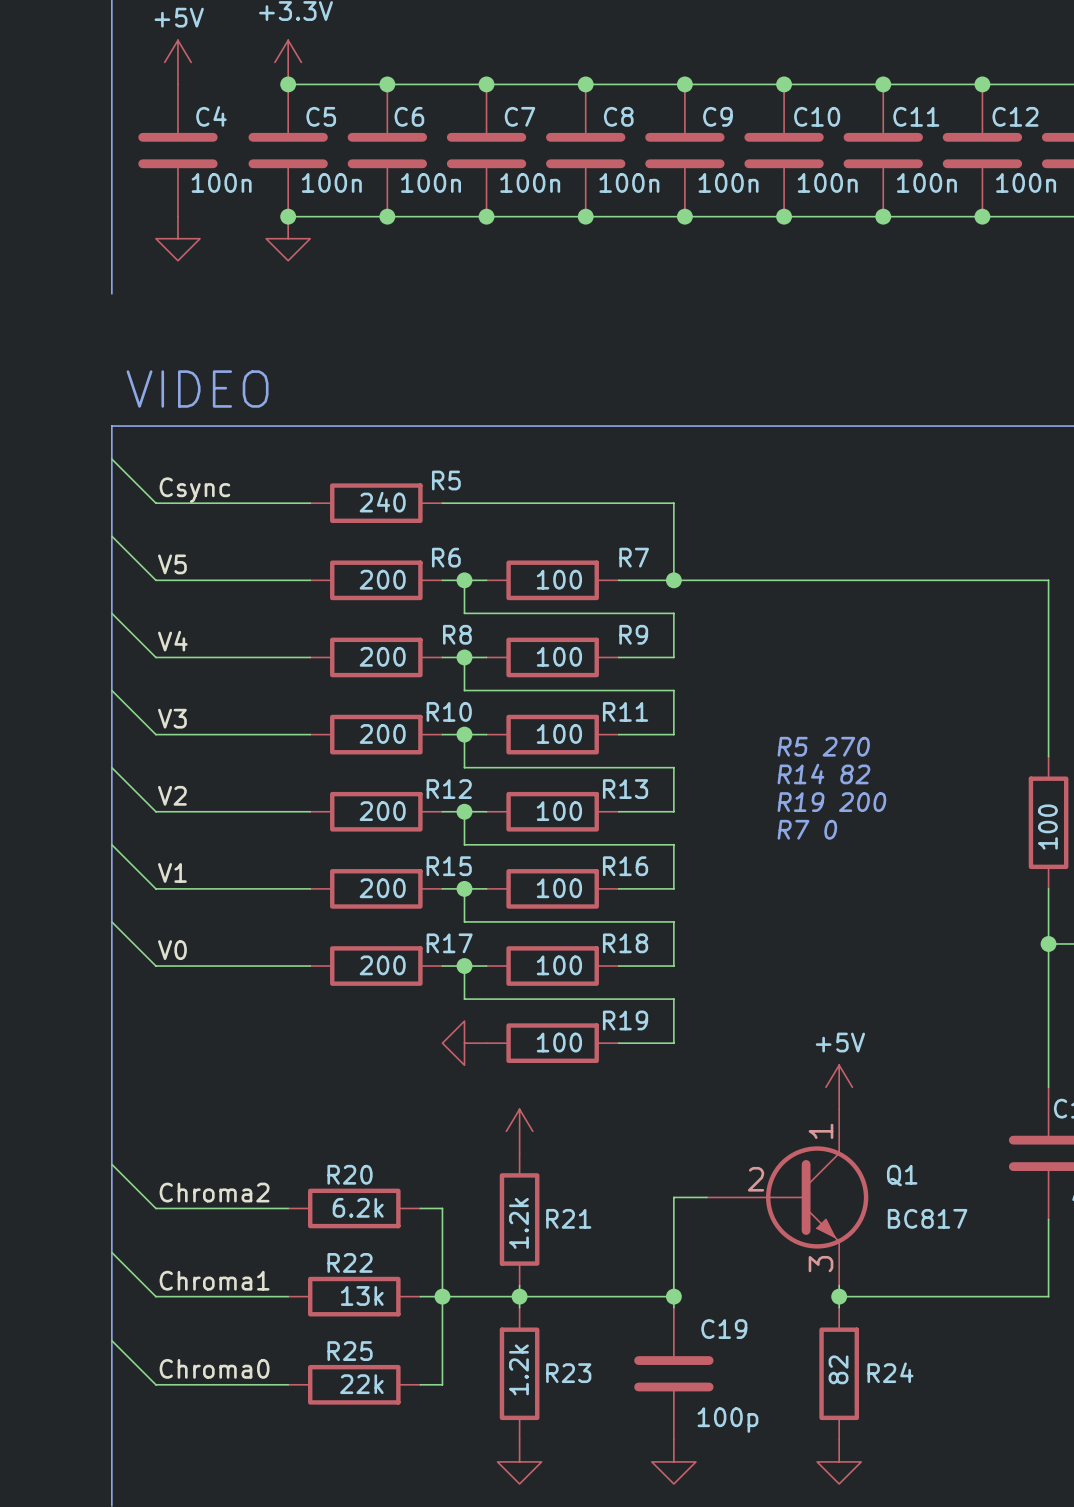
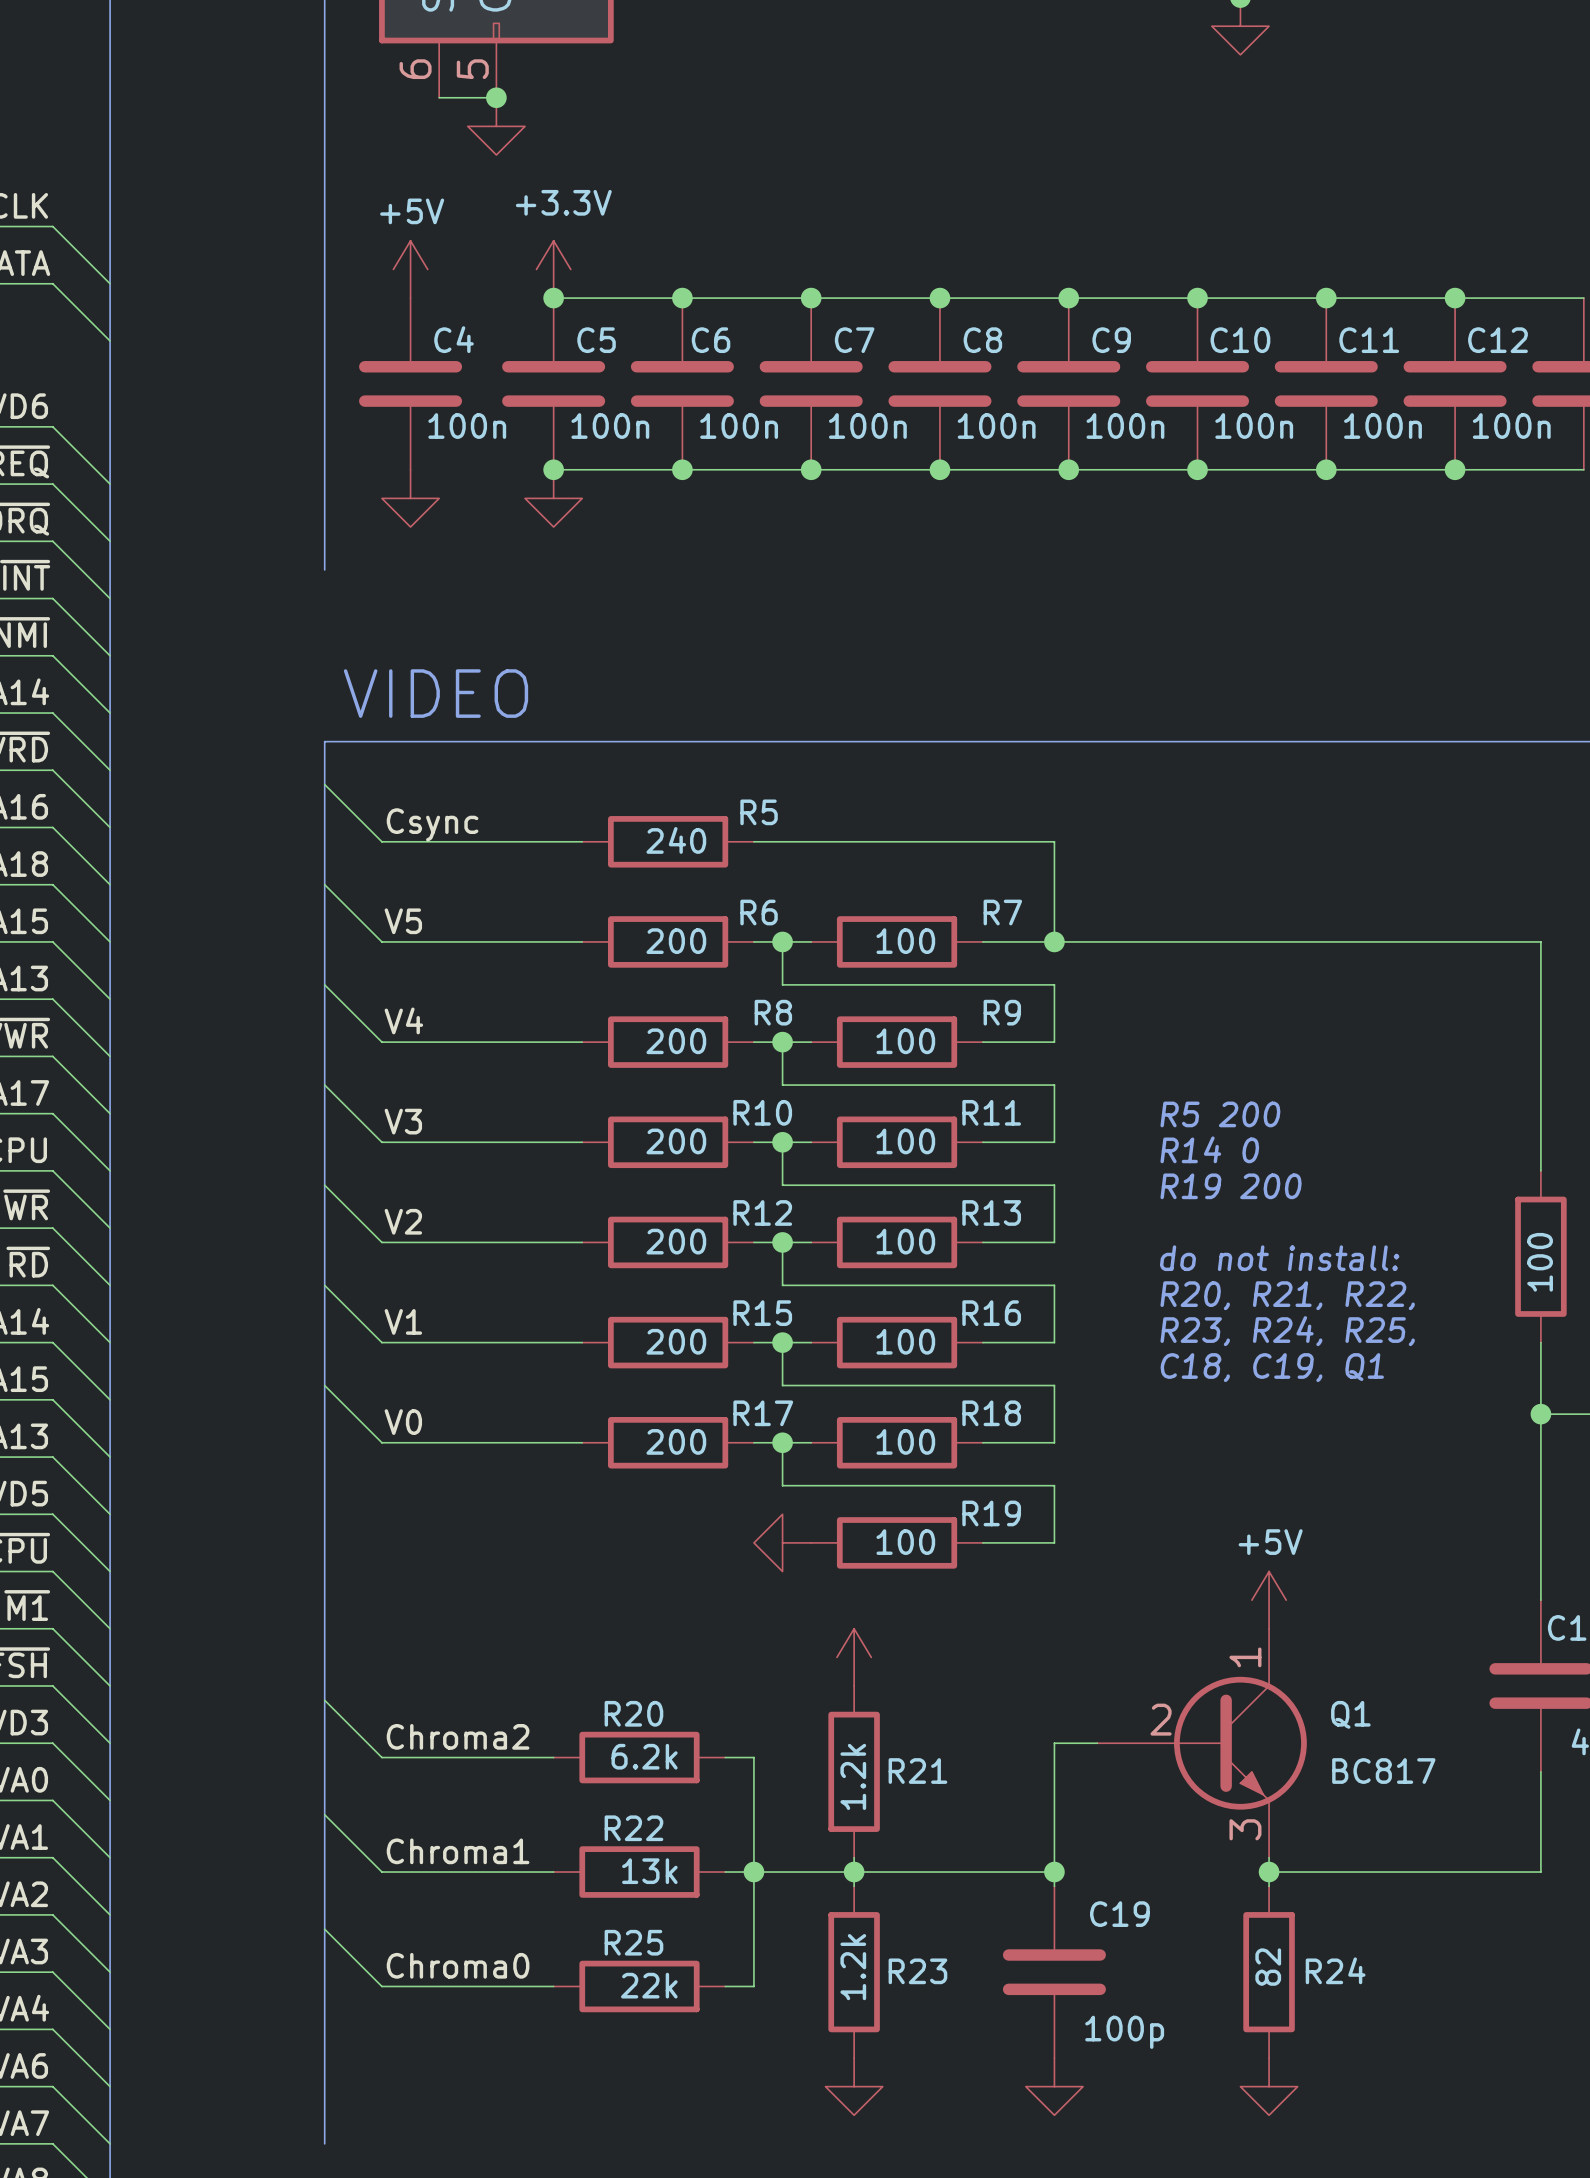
text: R5 270 (823, 746) -> R5 200 (1220, 1114)
text: R14 82 (823, 774) -> R14 0 (1209, 1149)
text position: R19 200 (831, 802) -> R19 200 (1231, 1186)
text: none -> do not install: (1279, 1258)
text: R7 0 (807, 829) -> none
text: none -> R20, R21, R22, (1287, 1295)
text: none -> R23, R24, R25, (1287, 1331)
text: none -> C18, C19, Q1 (1272, 1367)

